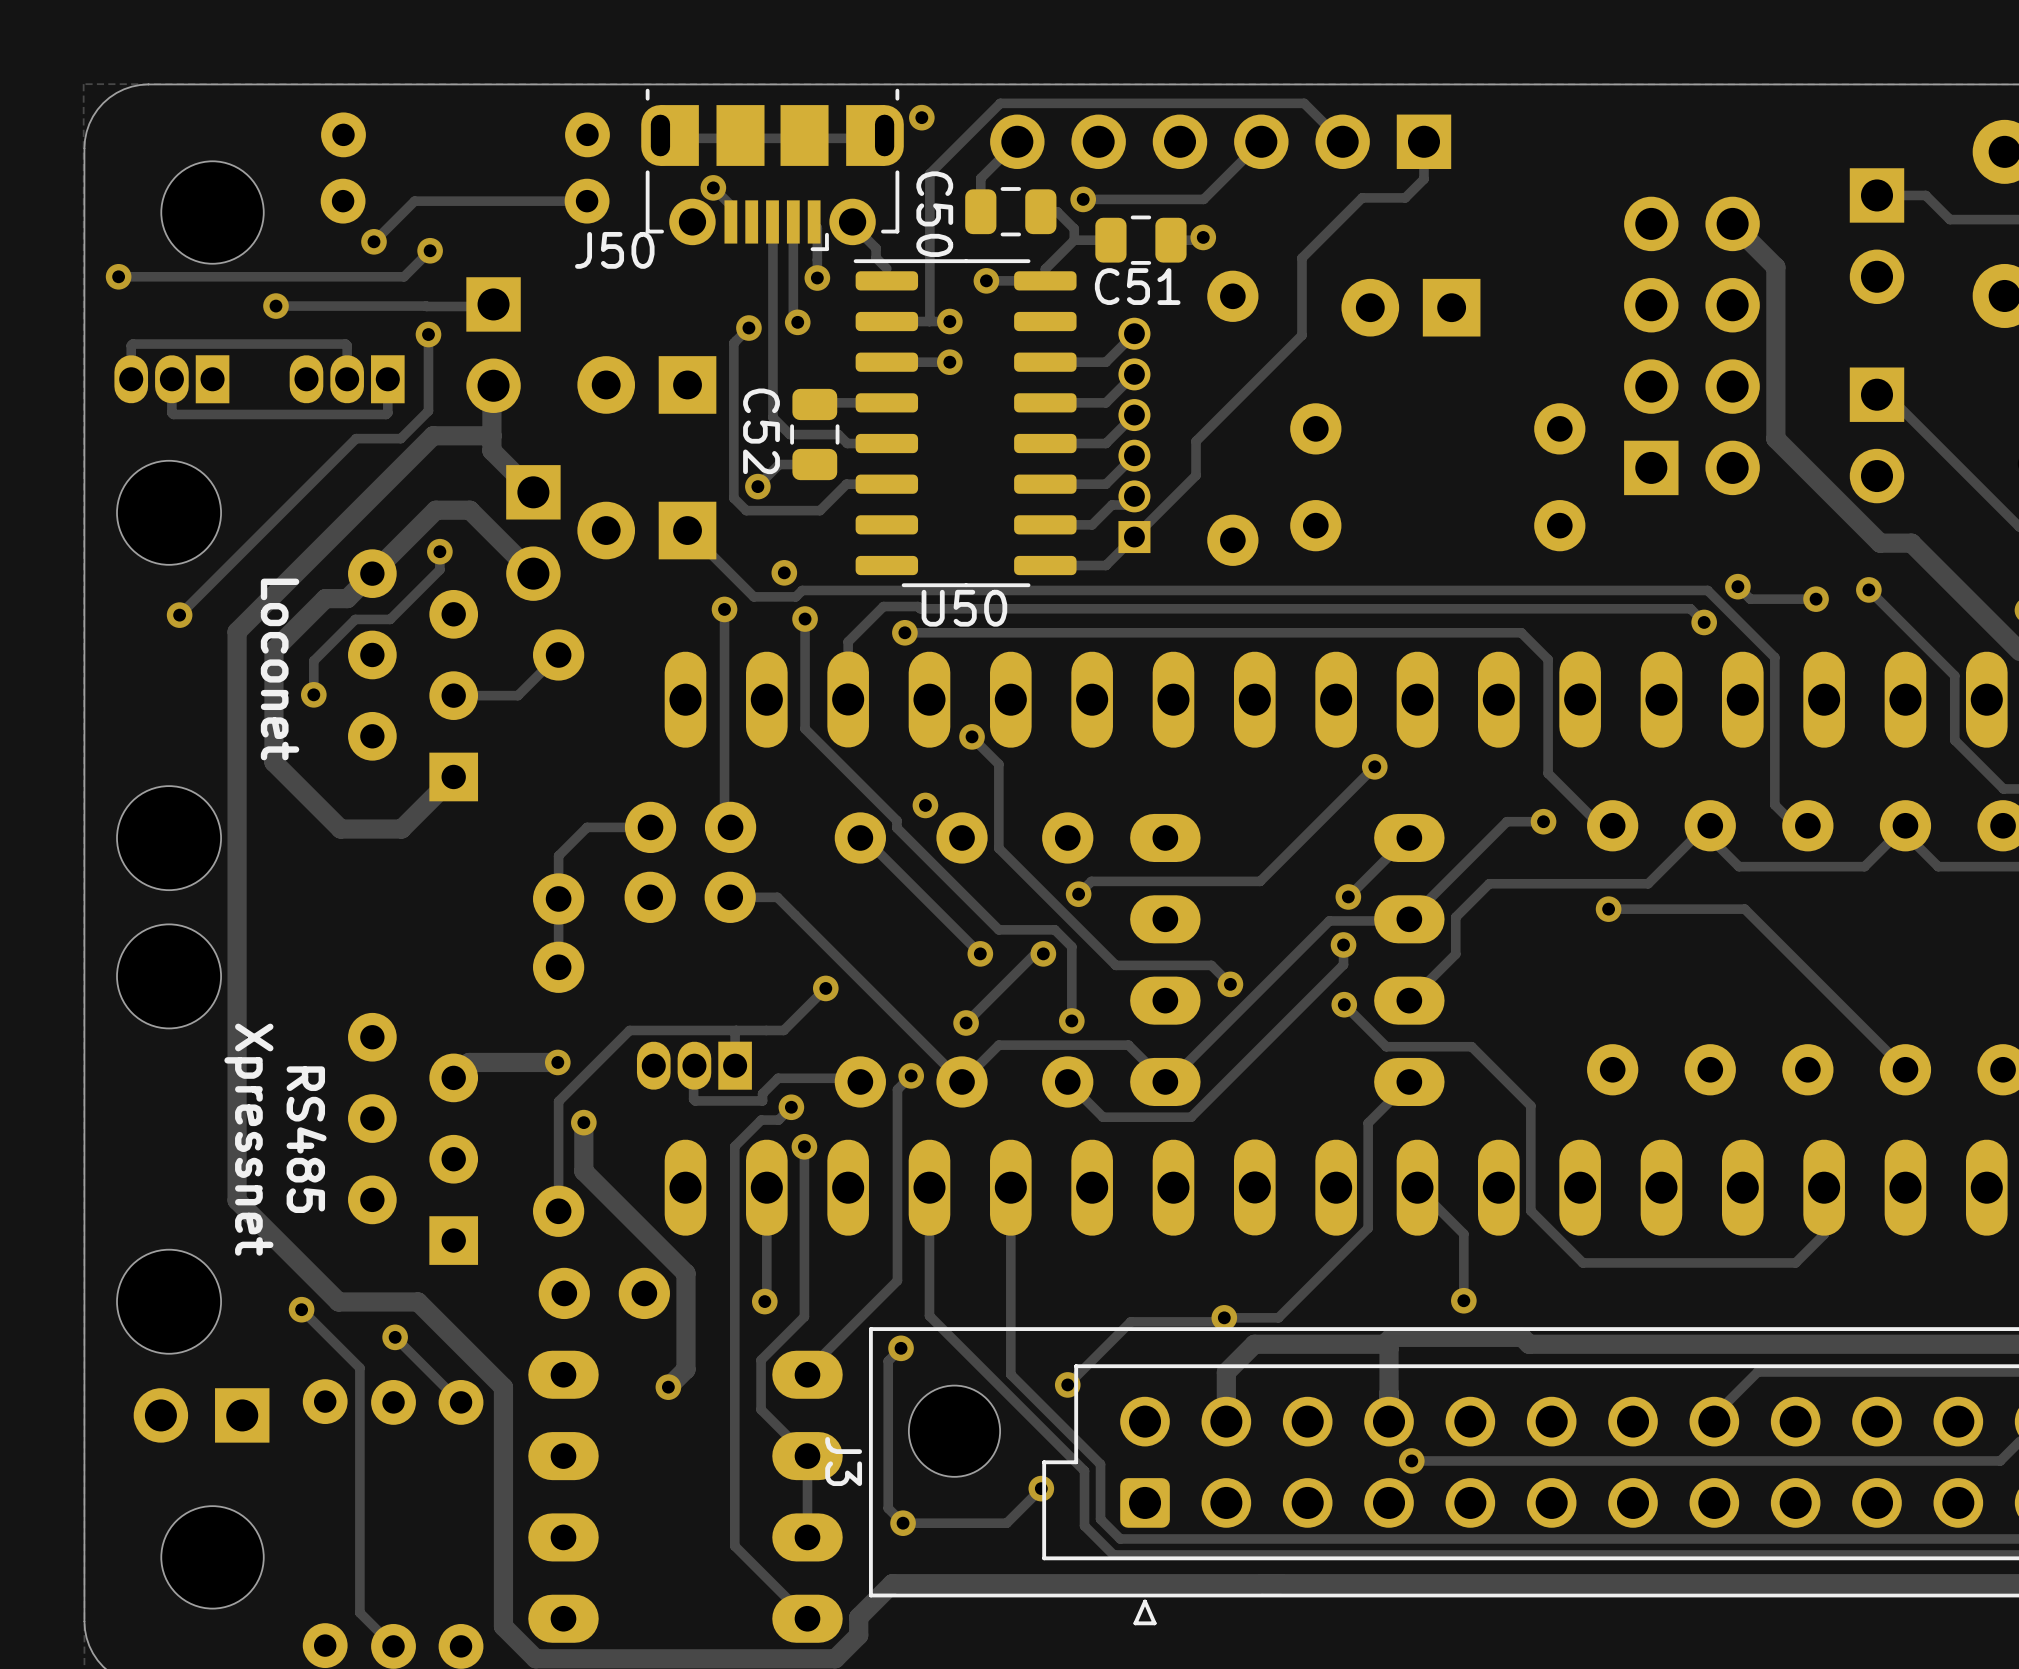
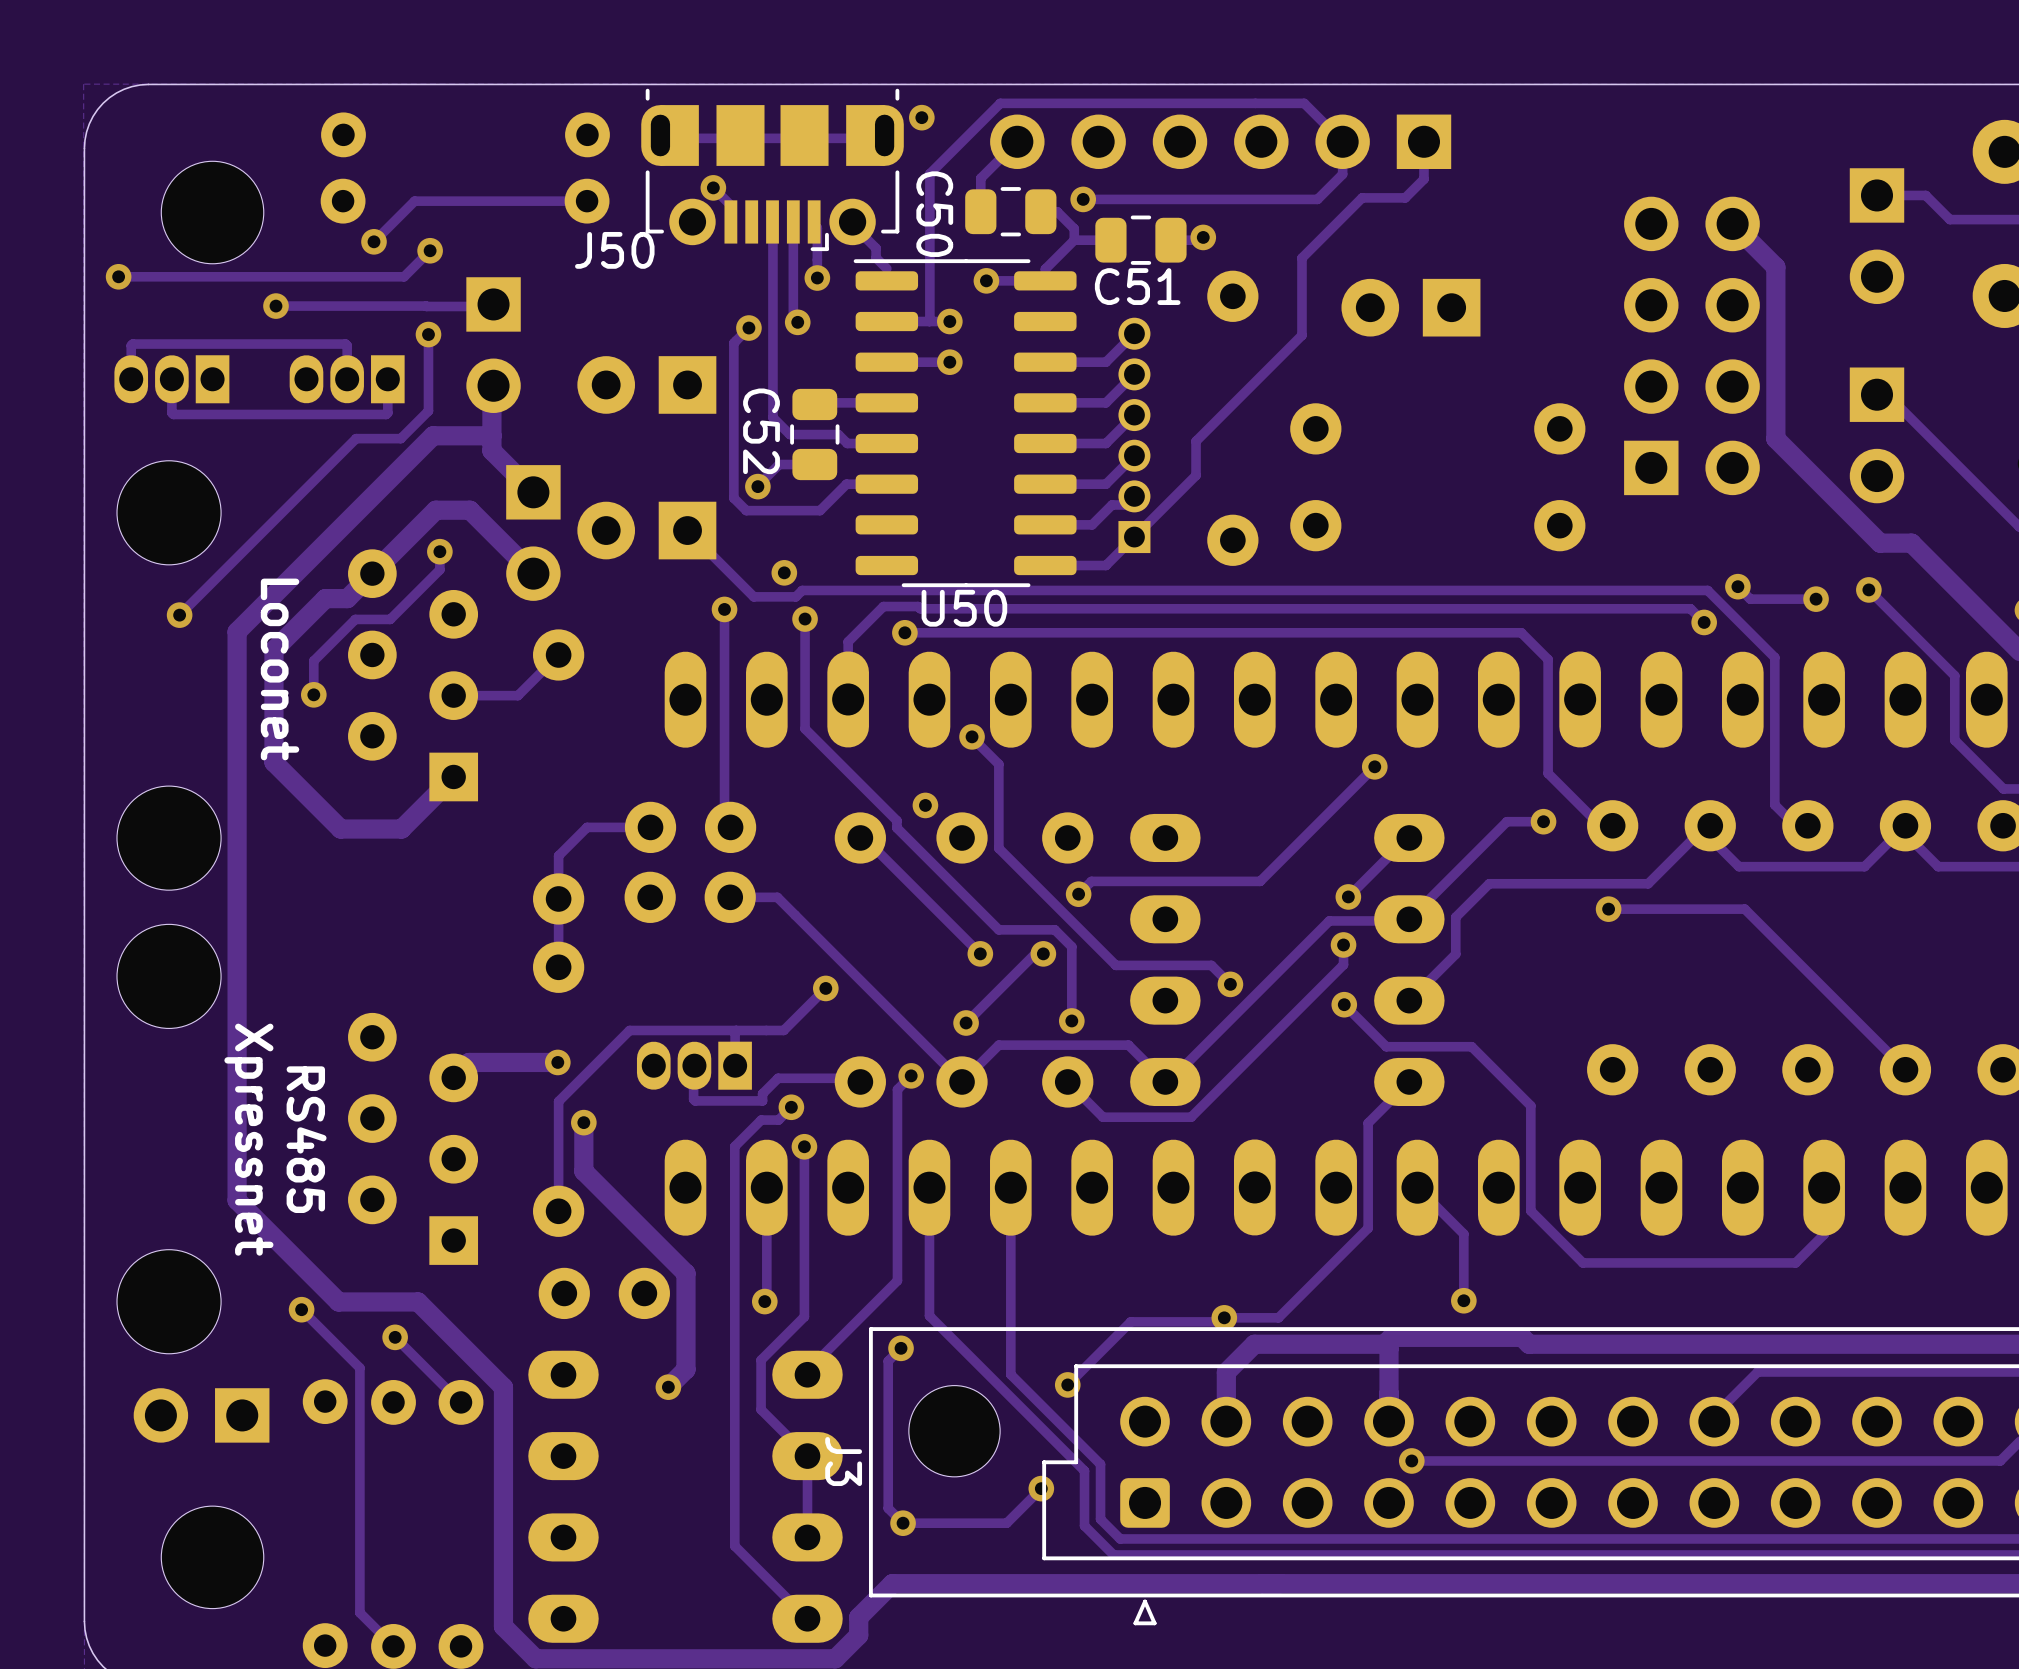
track: (1261, 141) (1203, 199) -> (1342, 141) (1342, 174) (1317, 199) (1203, 199)

